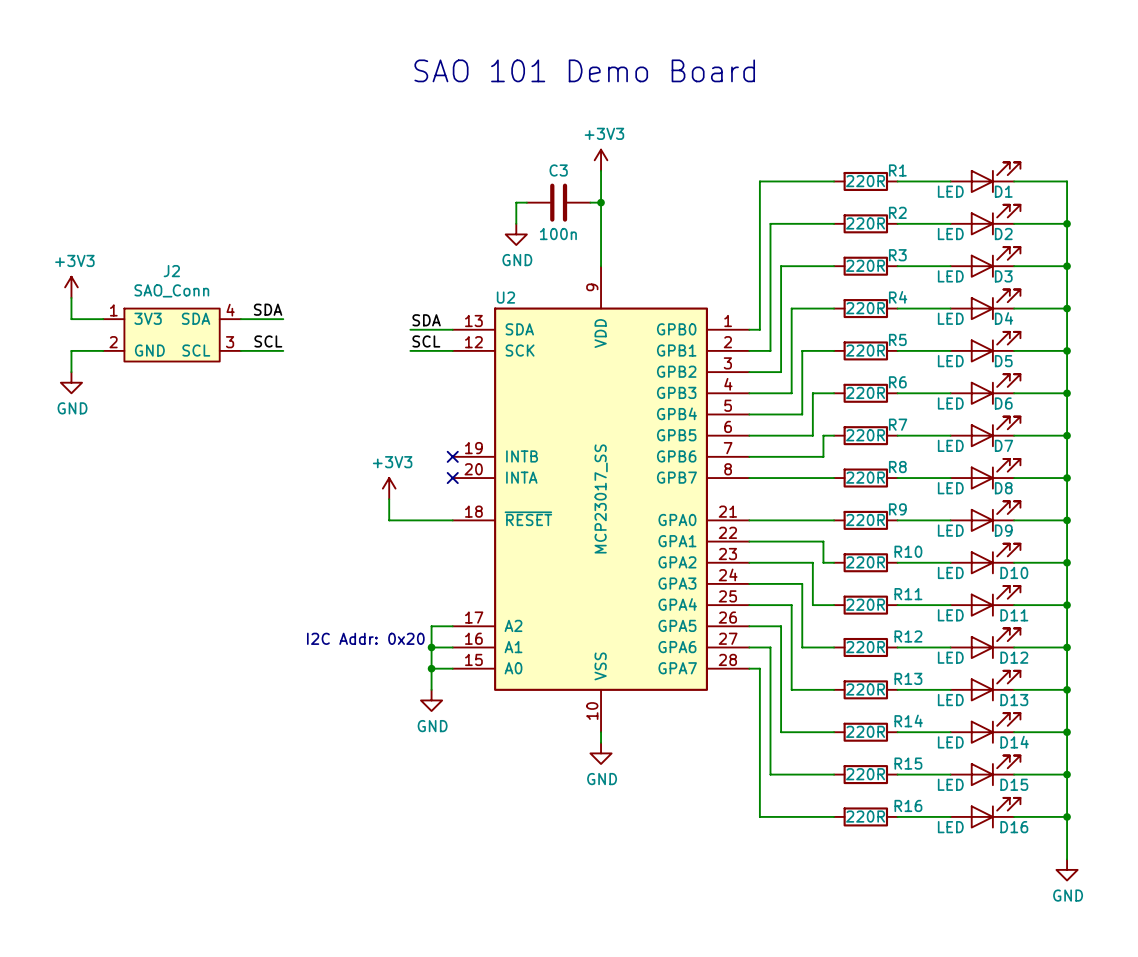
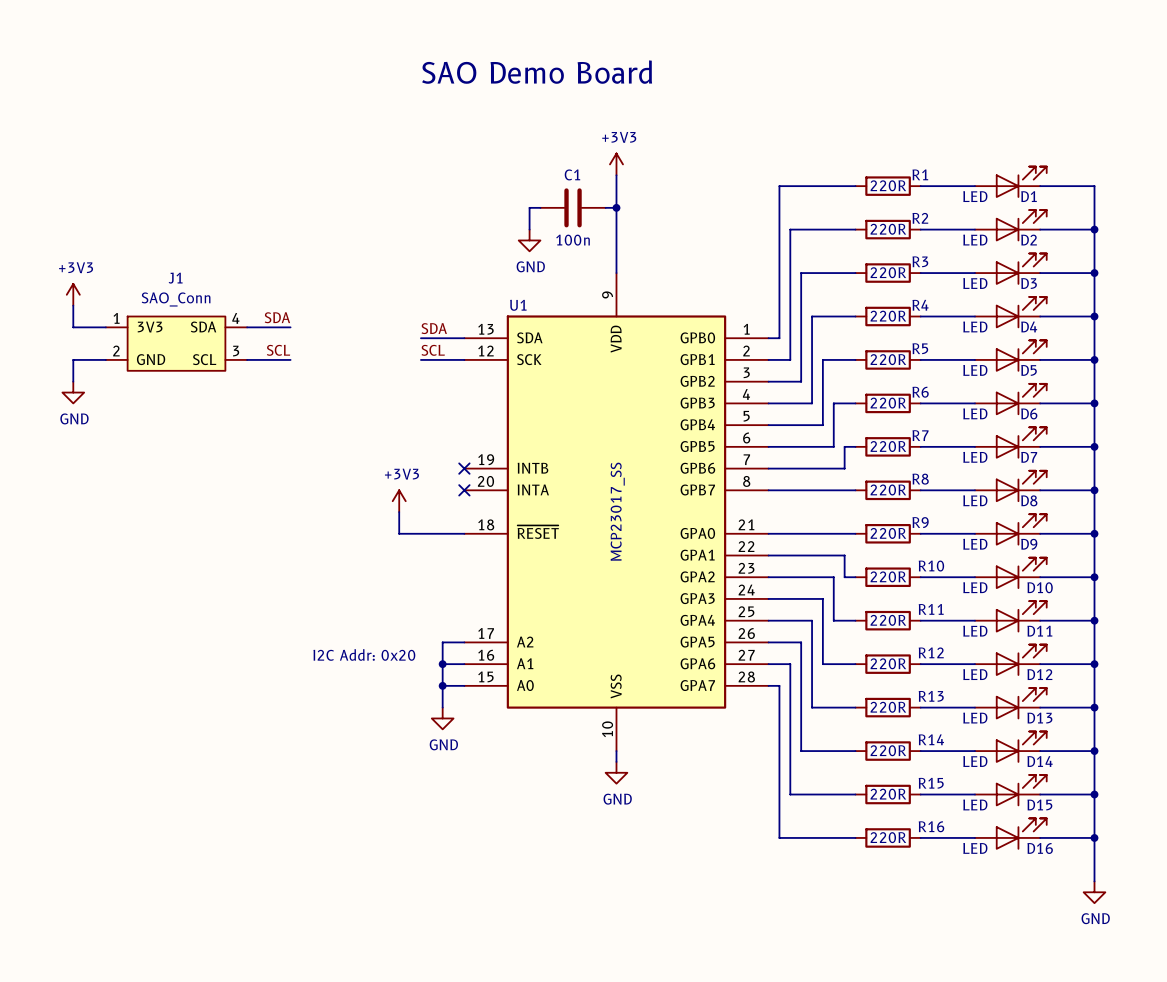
text: SAO 101 Demo Board (584, 70) -> SAO Demo Board (537, 72)
C3 name: C3 (558, 170) -> C1 (572, 174)
J2 name: J2 (171, 271) -> J1 (175, 278)
U2 name: U2 (505, 297) -> U1 (518, 305)

